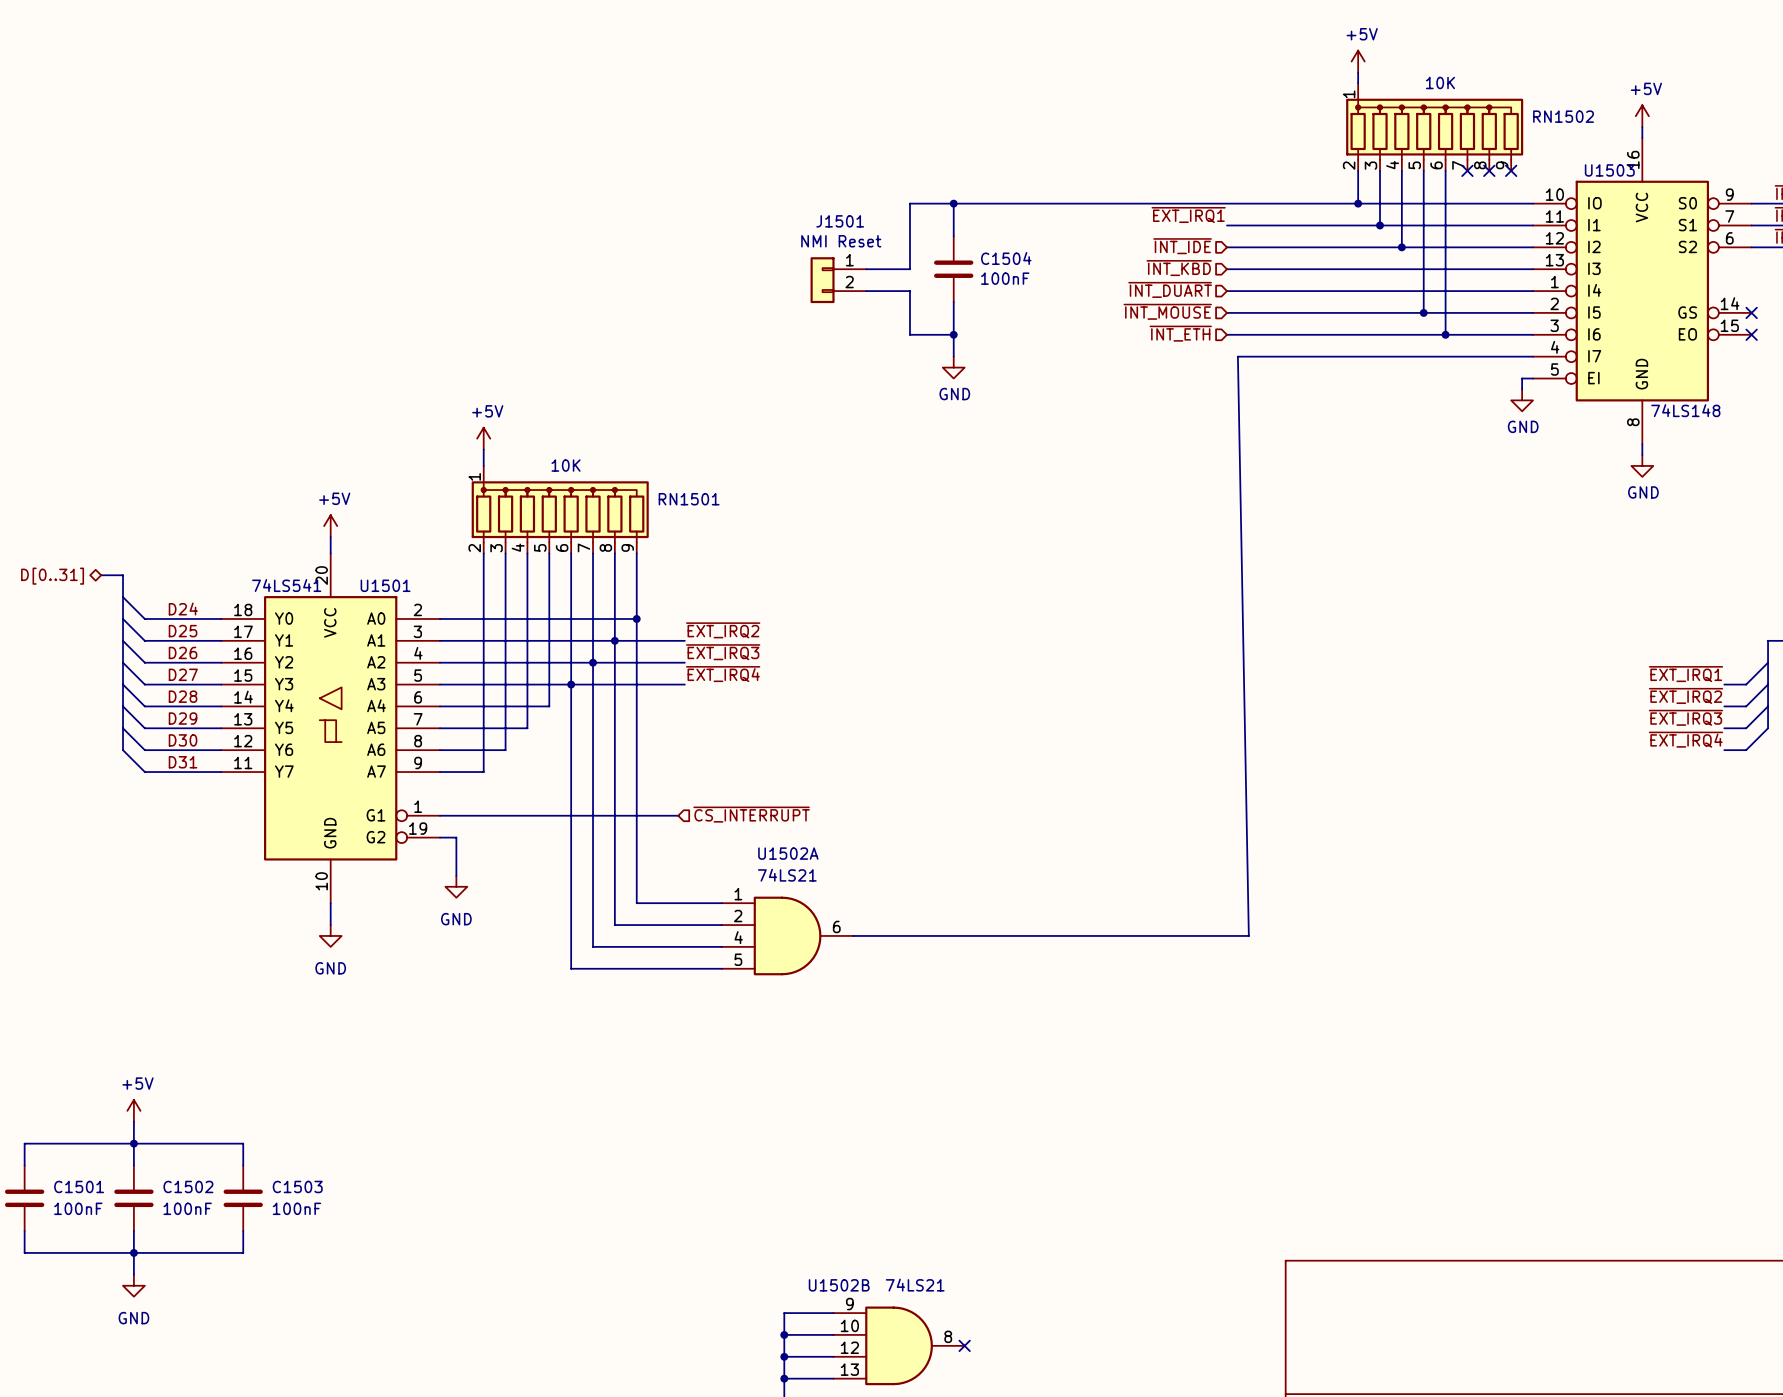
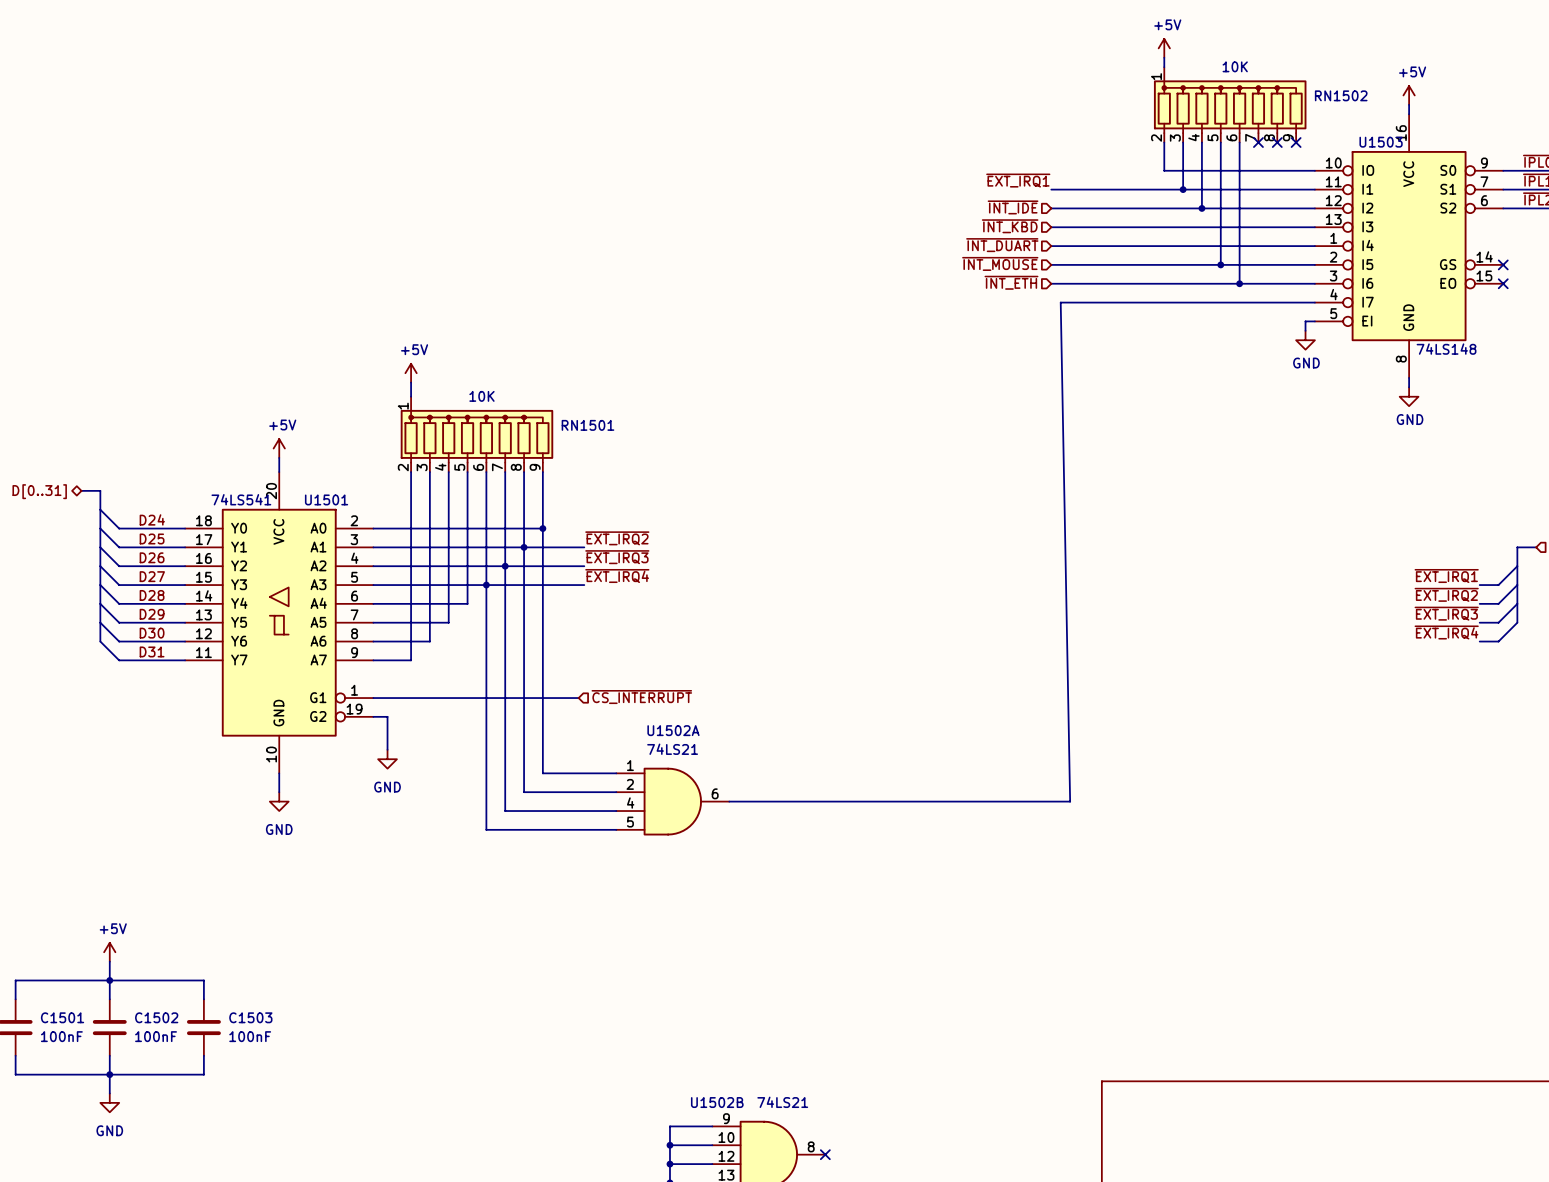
wire: (953, 203) (953, 236) -> none
junction: (953, 203) -> none
wire: (1358, 203) (910, 203) (910, 269) (866, 269) -> none
junction: (1358, 203) -> none
C1504: 100nF (953, 269) -> none
J1501: NMI Reset (838, 280) -> none
wire: (866, 291) (910, 291) (910, 334) (953, 334) -> none
wire: (953, 302) (953, 356) -> none
junction: (953, 334) -> none
power symbol: GND (953, 367) -> none

